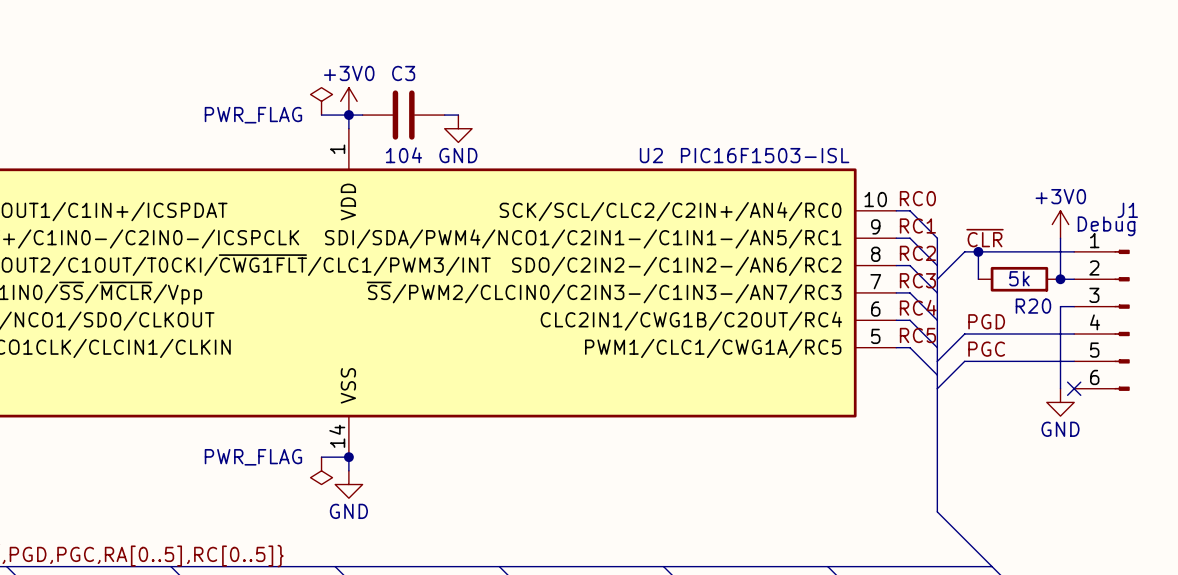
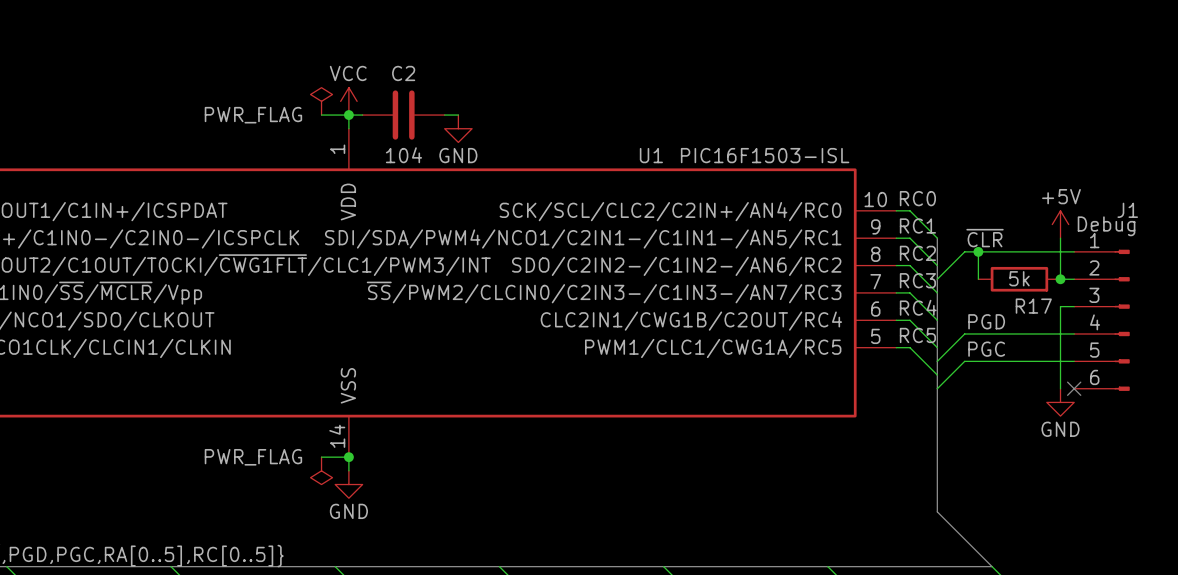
C3 name: C3 (403, 73) -> C2 (403, 73)
power symbol: +3V0 (348, 101) -> VCC (348, 101)
U2 name: U2 (651, 155) -> U1 (651, 155)
power symbol: +3V0 (1060, 224) -> +5V (1060, 224)
R20 name: R20 (1033, 306) -> R17 (1033, 306)

